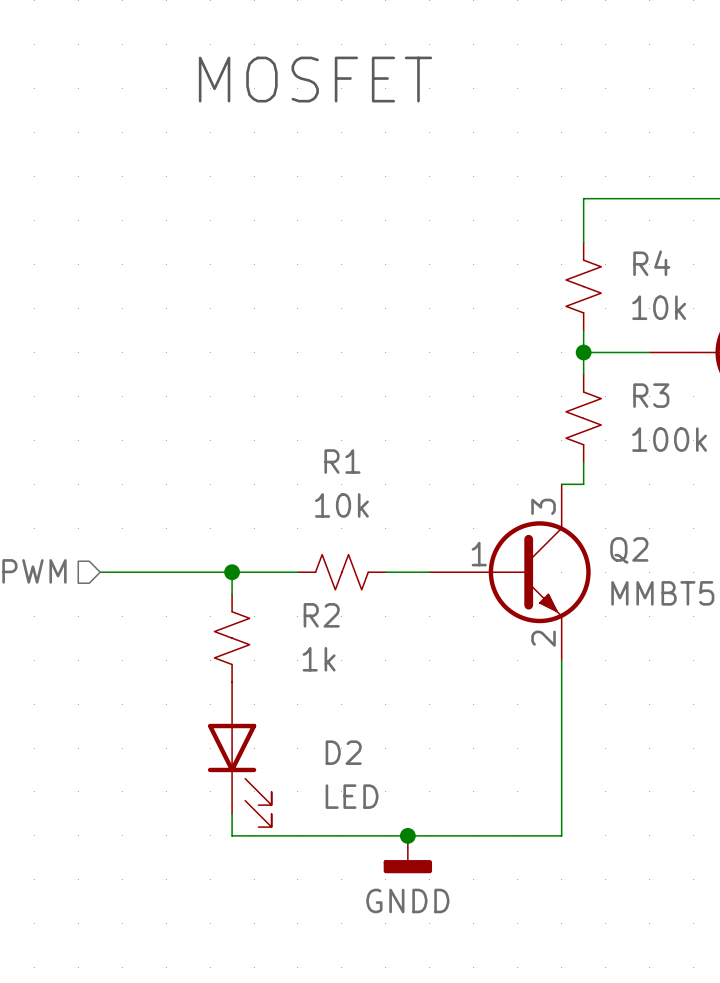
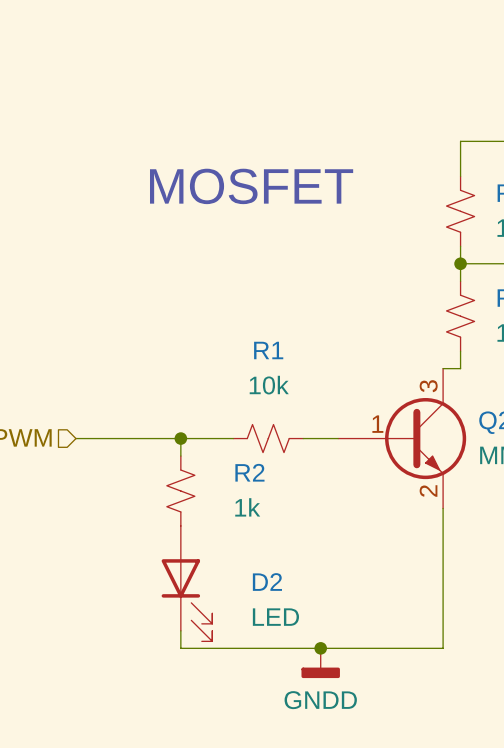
text position: MOSFET (315, 79) -> MOSFET (251, 186)

